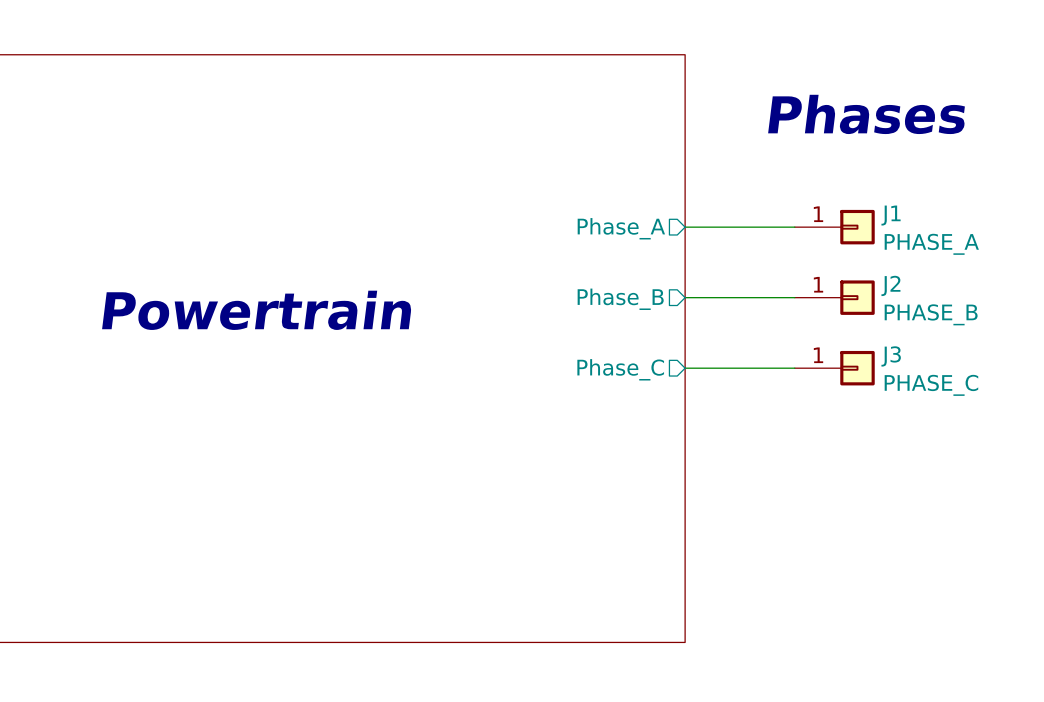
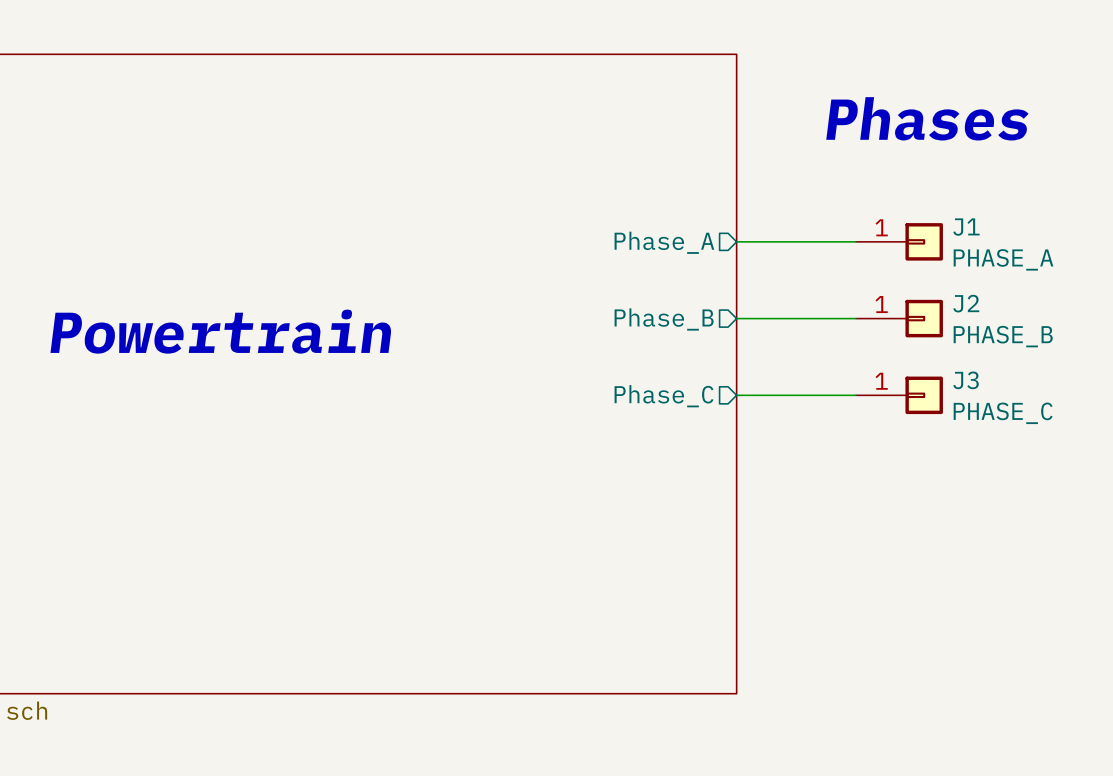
text position: Powertrain (256, 310) -> Powertrain (220, 331)

